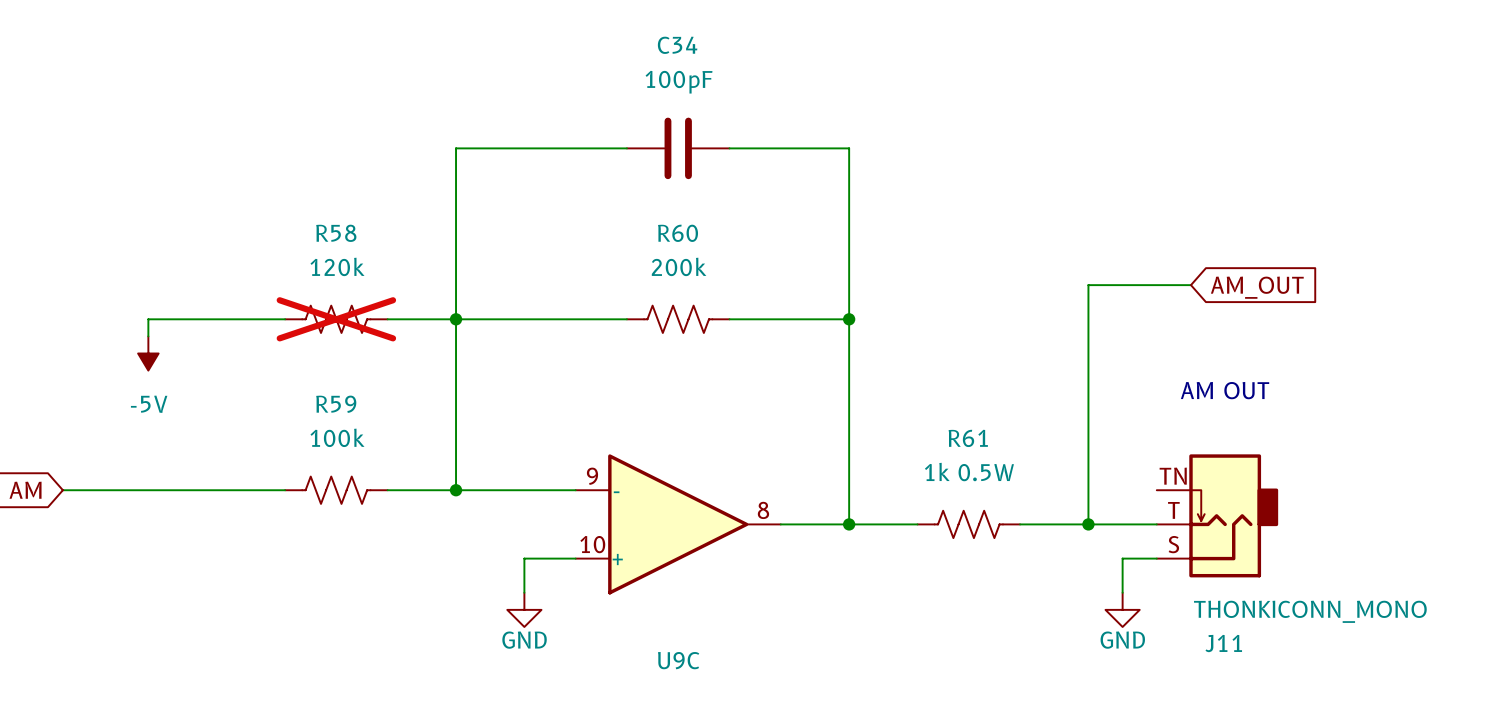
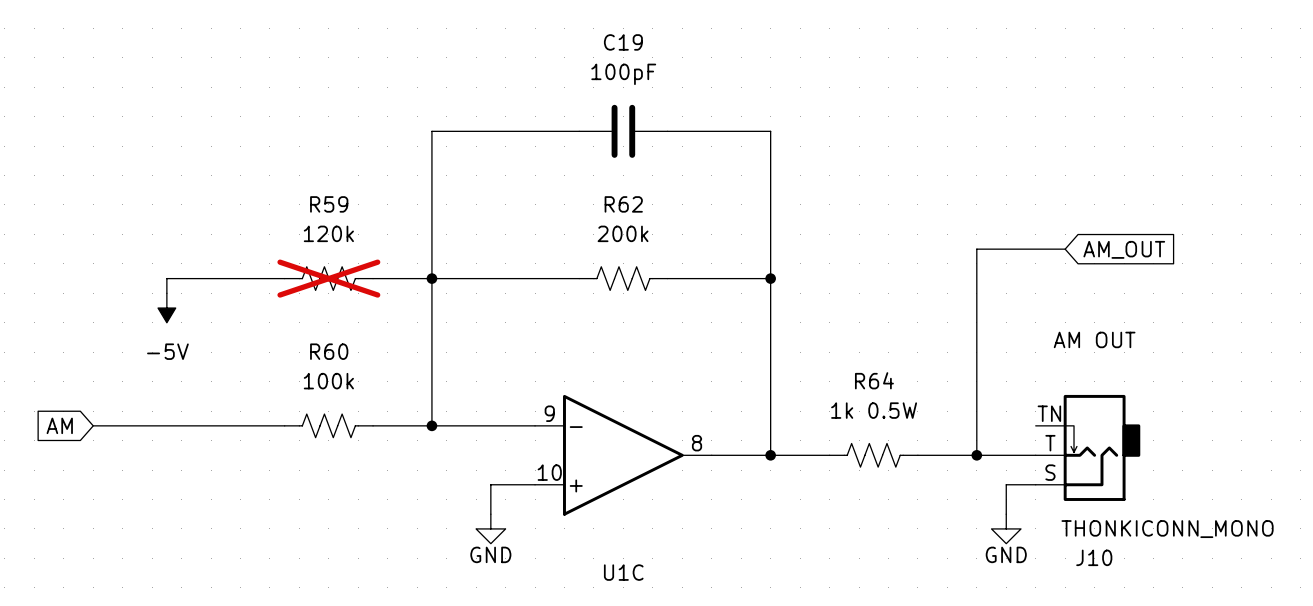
C34 name: C34 (677, 45) -> C19 (623, 42)
R58 name: R58 (336, 233) -> R59 (329, 204)
R60 name: R60 (678, 233) -> R62 (623, 204)
R59 name: R59 (336, 404) -> R60 (329, 351)
R61 name: R61 (968, 438) -> R64 (874, 380)
J11 name: J11 (1223, 643) -> J10 (1094, 557)
U9C name: U9C (678, 660) -> U1C (623, 572)

